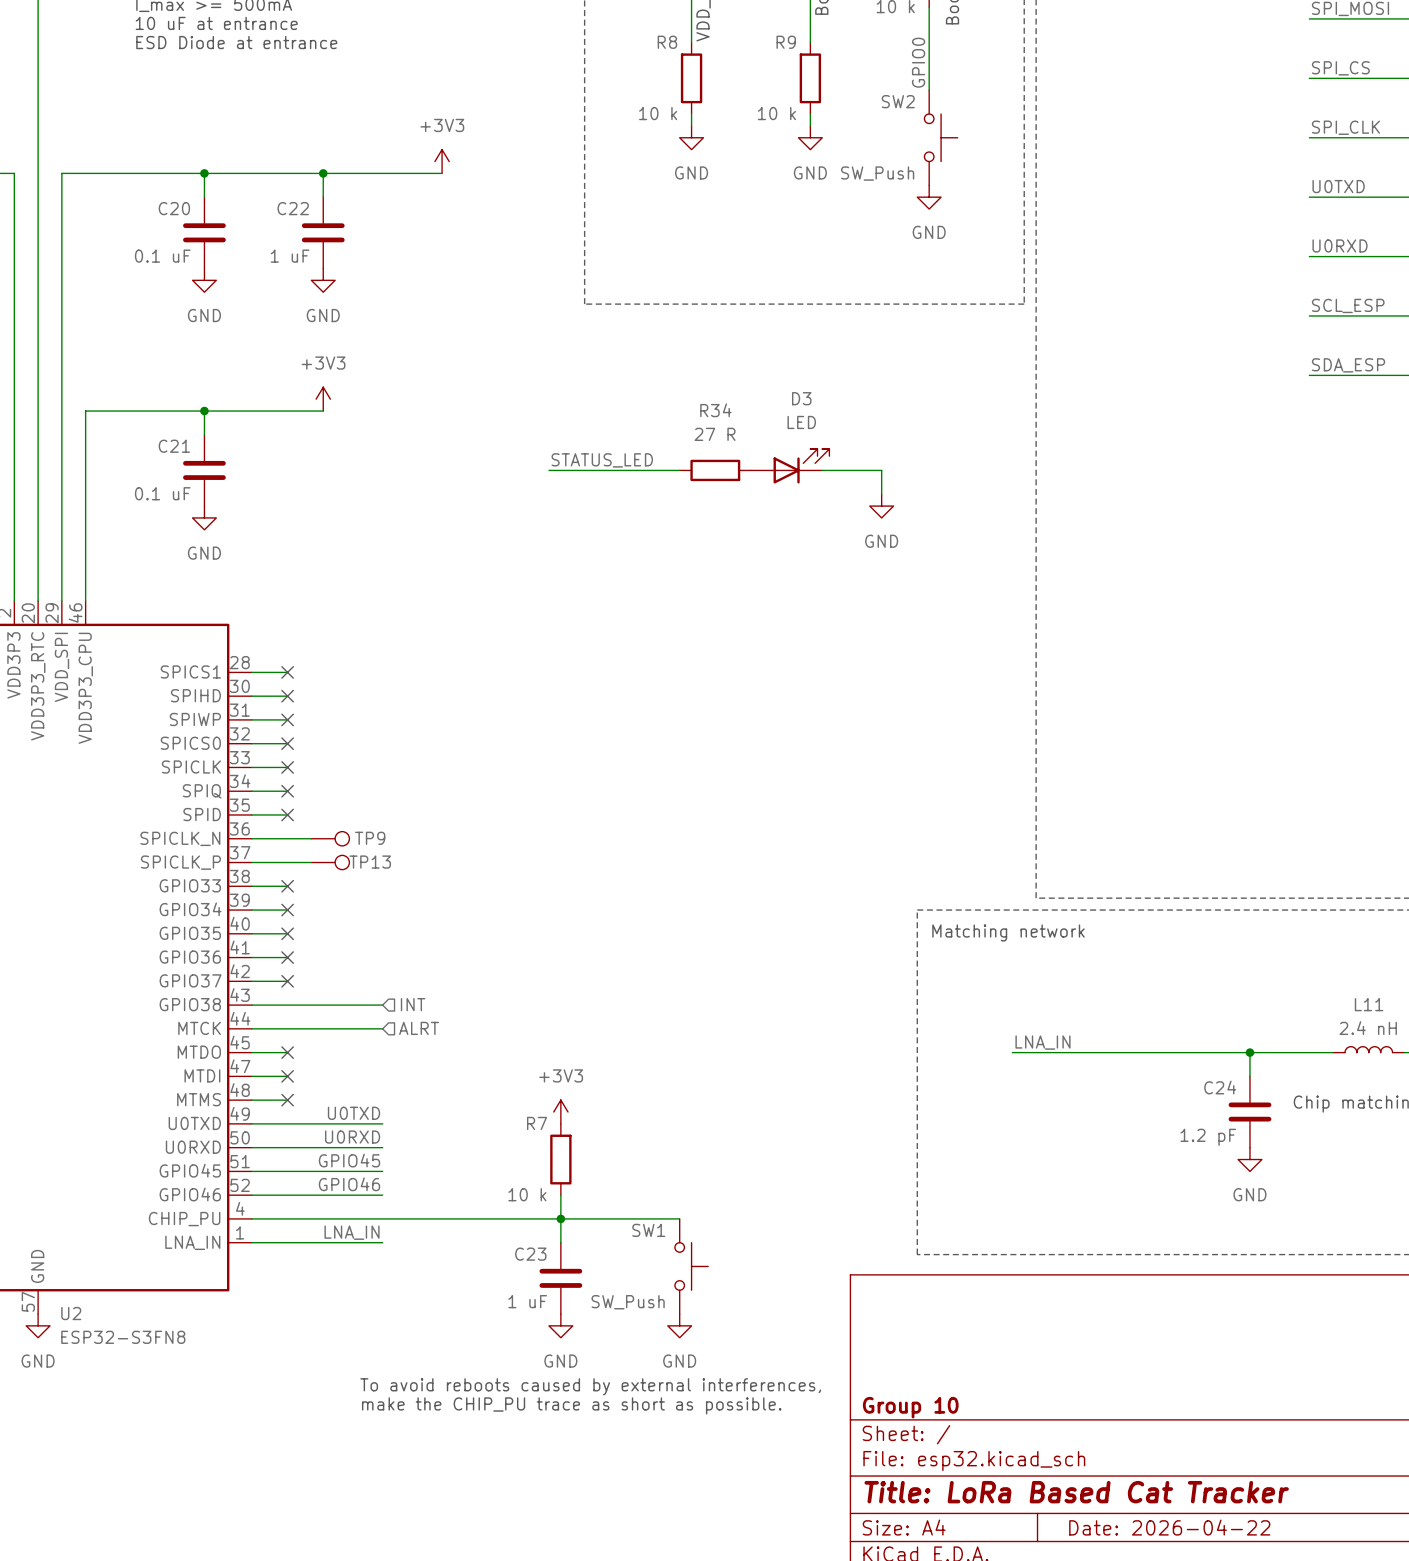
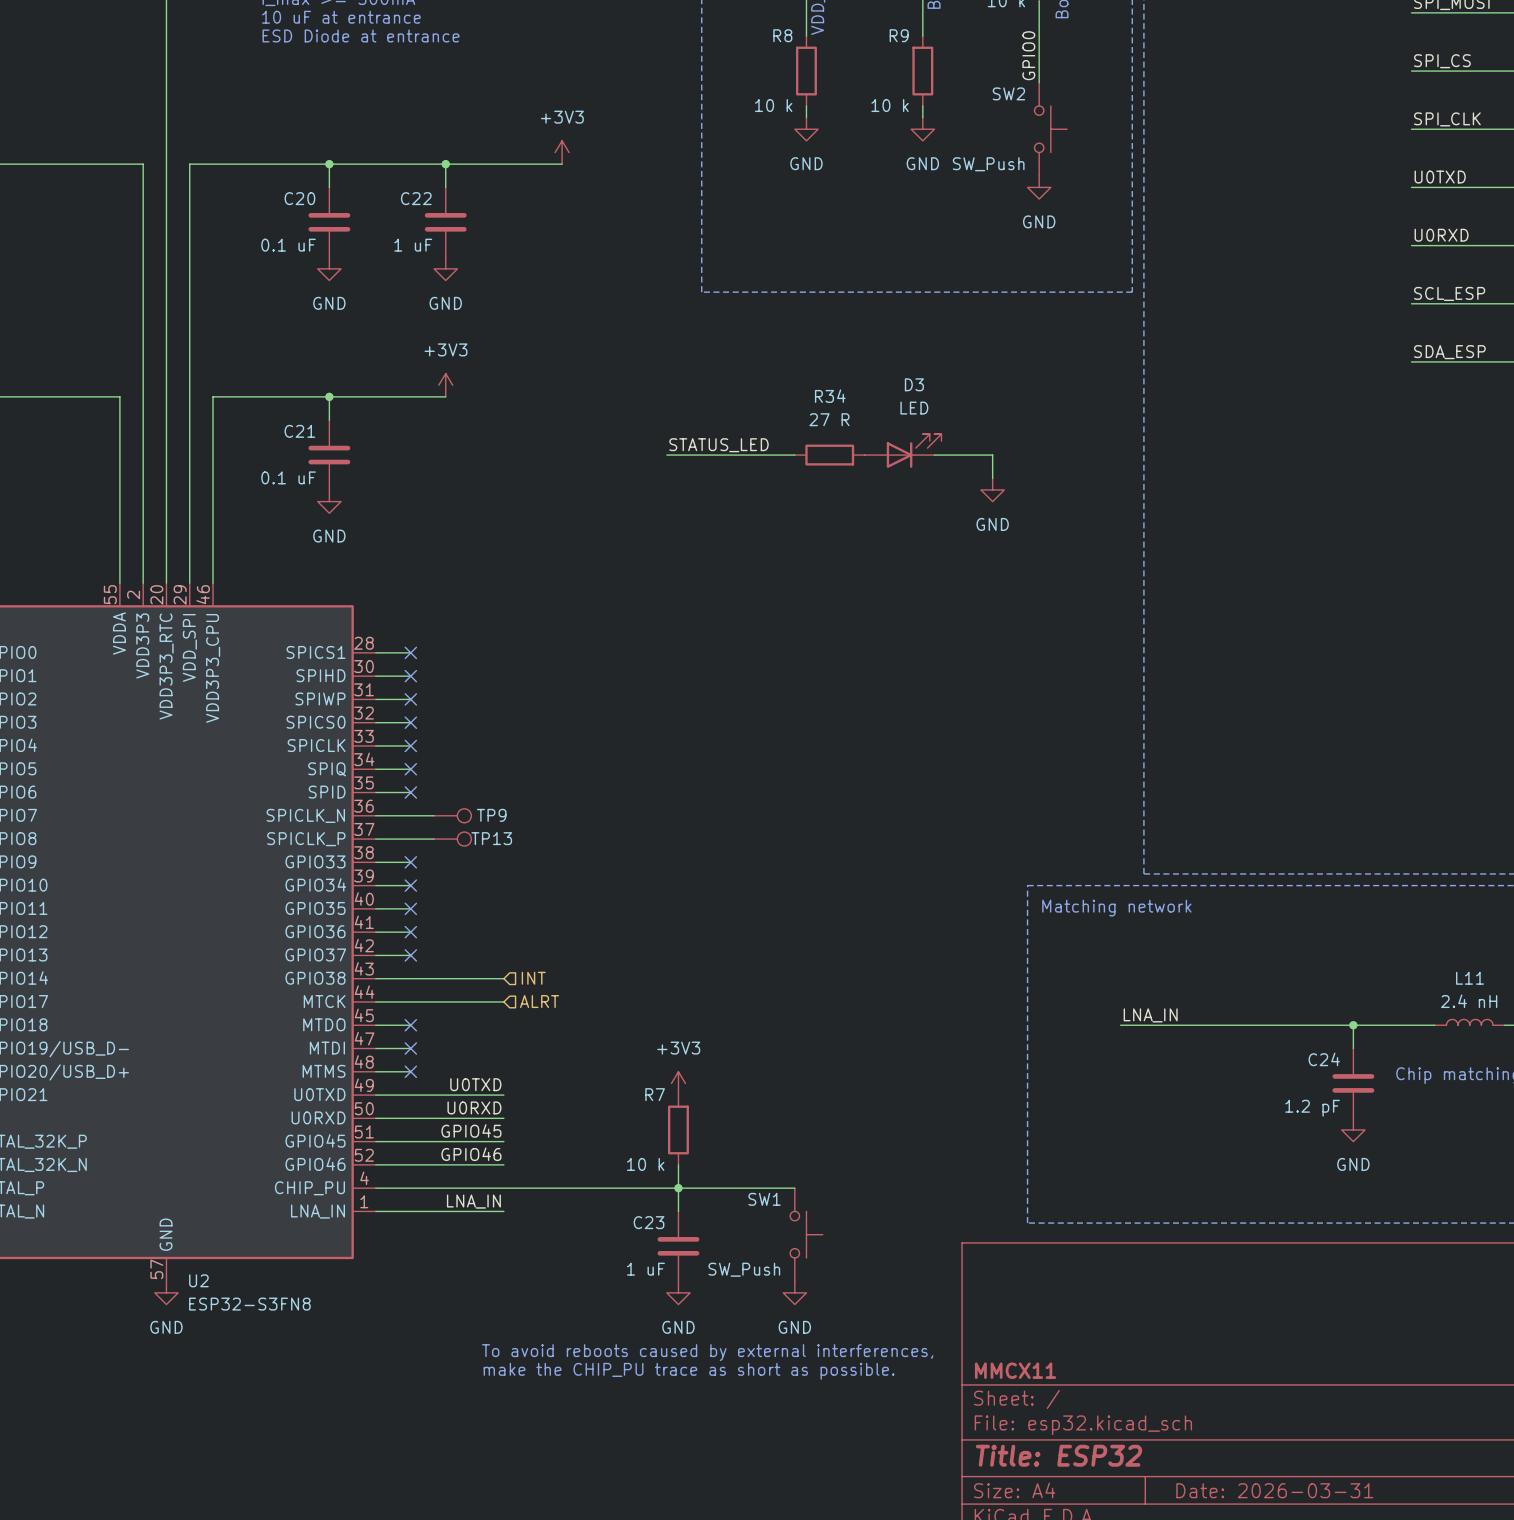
title block: Group 10 (910, 1407) -> MMCX11 (1015, 1370)
title block: Title: LoRa Based Cat Tracker (1076, 1492) -> Title: ESP32 (1059, 1455)
title block: Date: 2026-04-22 (1169, 1527) -> Date: 2026-03-31 (1274, 1490)

